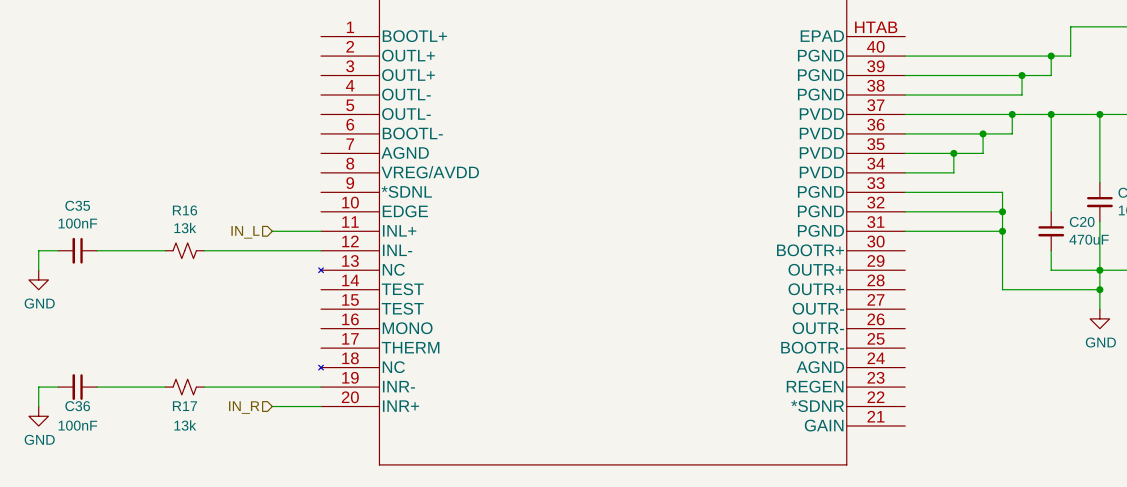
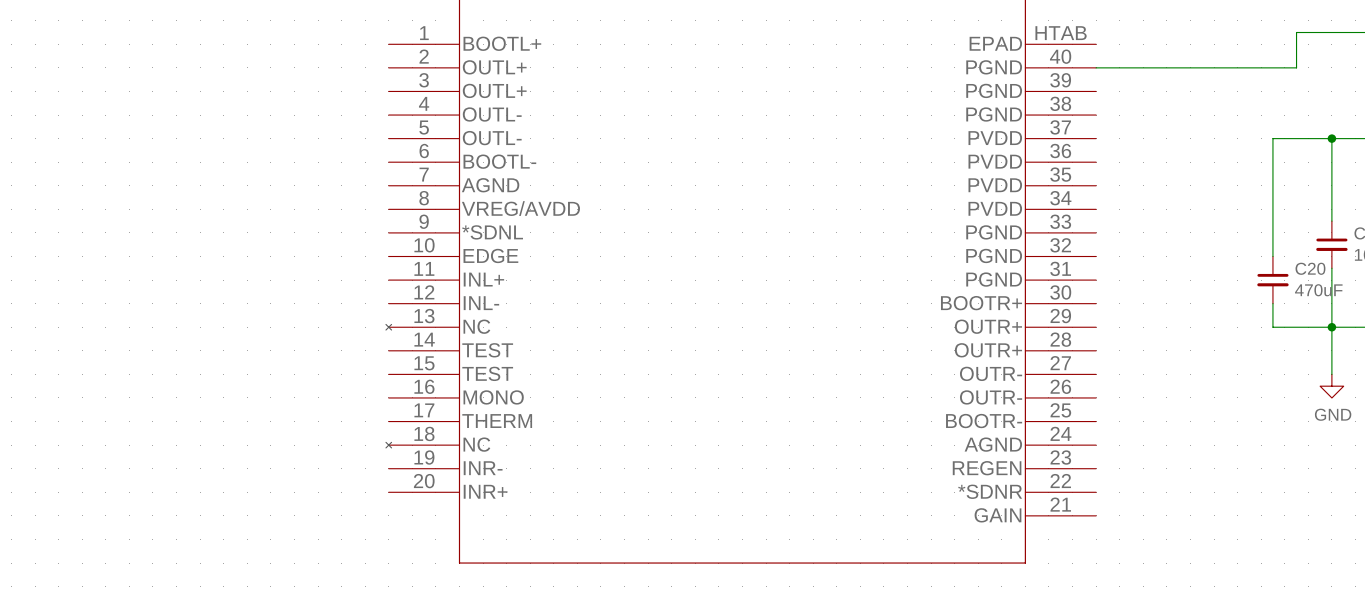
wire: (1051, 56) (1051, 75) (905, 75) -> none
junction: (1051, 56) -> none
wire: (1021, 75) (1021, 94) (905, 94) -> none
junction: (1021, 75) -> none
wire: (905, 114) (1051, 114) -> none
wire: (1012, 114) (1012, 133) (905, 133) -> none
junction: (1012, 114) -> none
junction: (1051, 114) -> none
wire: (983, 133) (983, 153) (905, 153) -> none
junction: (983, 133) -> none
wire: (953, 153) (953, 172) (905, 172) -> none
junction: (953, 153) -> none
wire: (905, 192) (1002, 192) (1002, 289) (1099, 289) -> none
wire: (905, 211) (1002, 211) -> none
junction: (1002, 211) -> none
wire: (272, 231) (321, 231) -> none
wire: (905, 231) (1002, 231) -> none
junction: (1002, 231) -> none
hierarchical label: IN_L (245, 232) -> none
wire: (58, 250) (38, 250) (38, 270) -> none
C35: 100nF (77, 250) -> none
wire: (97, 250) (165, 250) -> none
R16: 13k (184, 250) -> none
wire: (204, 250) (321, 250) -> none
power symbol: GND (38, 279) -> none
junction: (1099, 289) -> none
wire: (58, 387) (38, 387) (38, 406) -> none
C36: 100nF (77, 387) -> none
wire: (97, 387) (165, 387) -> none
R17: 13k (184, 387) -> none
wire: (204, 387) (321, 387) -> none
wire: (272, 406) (321, 406) -> none
hierarchical label: IN_R (244, 407) -> none
power symbol: GND (38, 416) -> none

